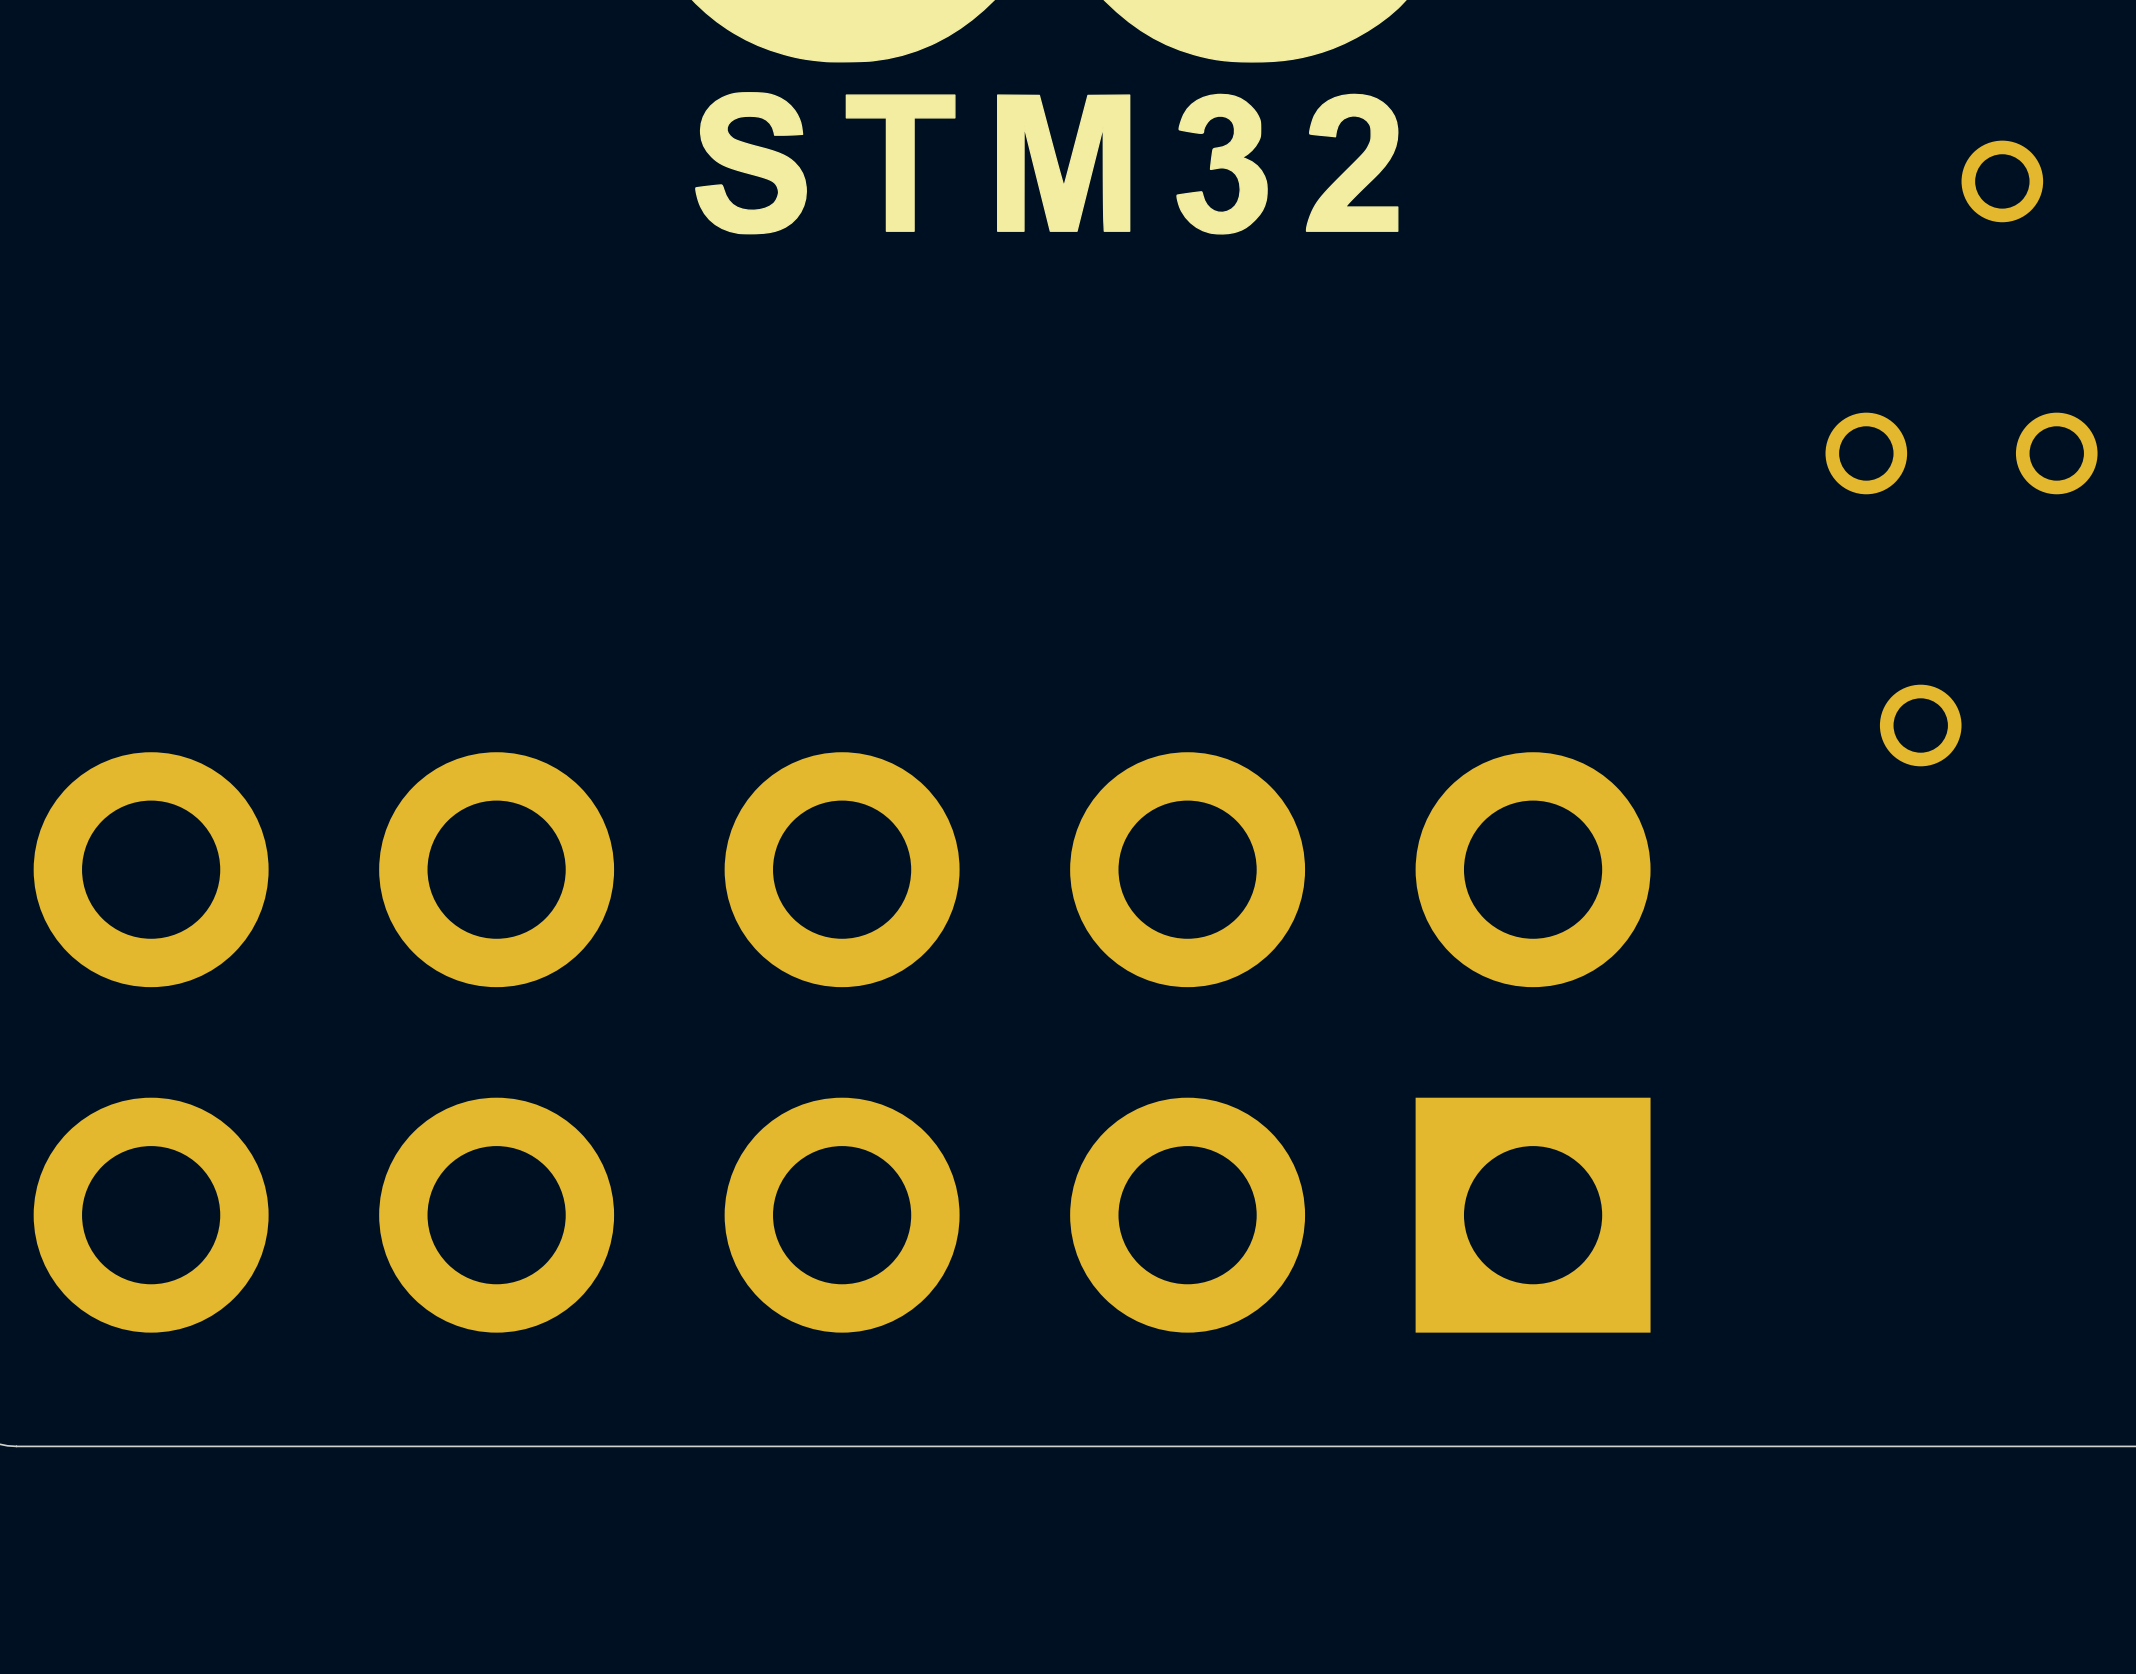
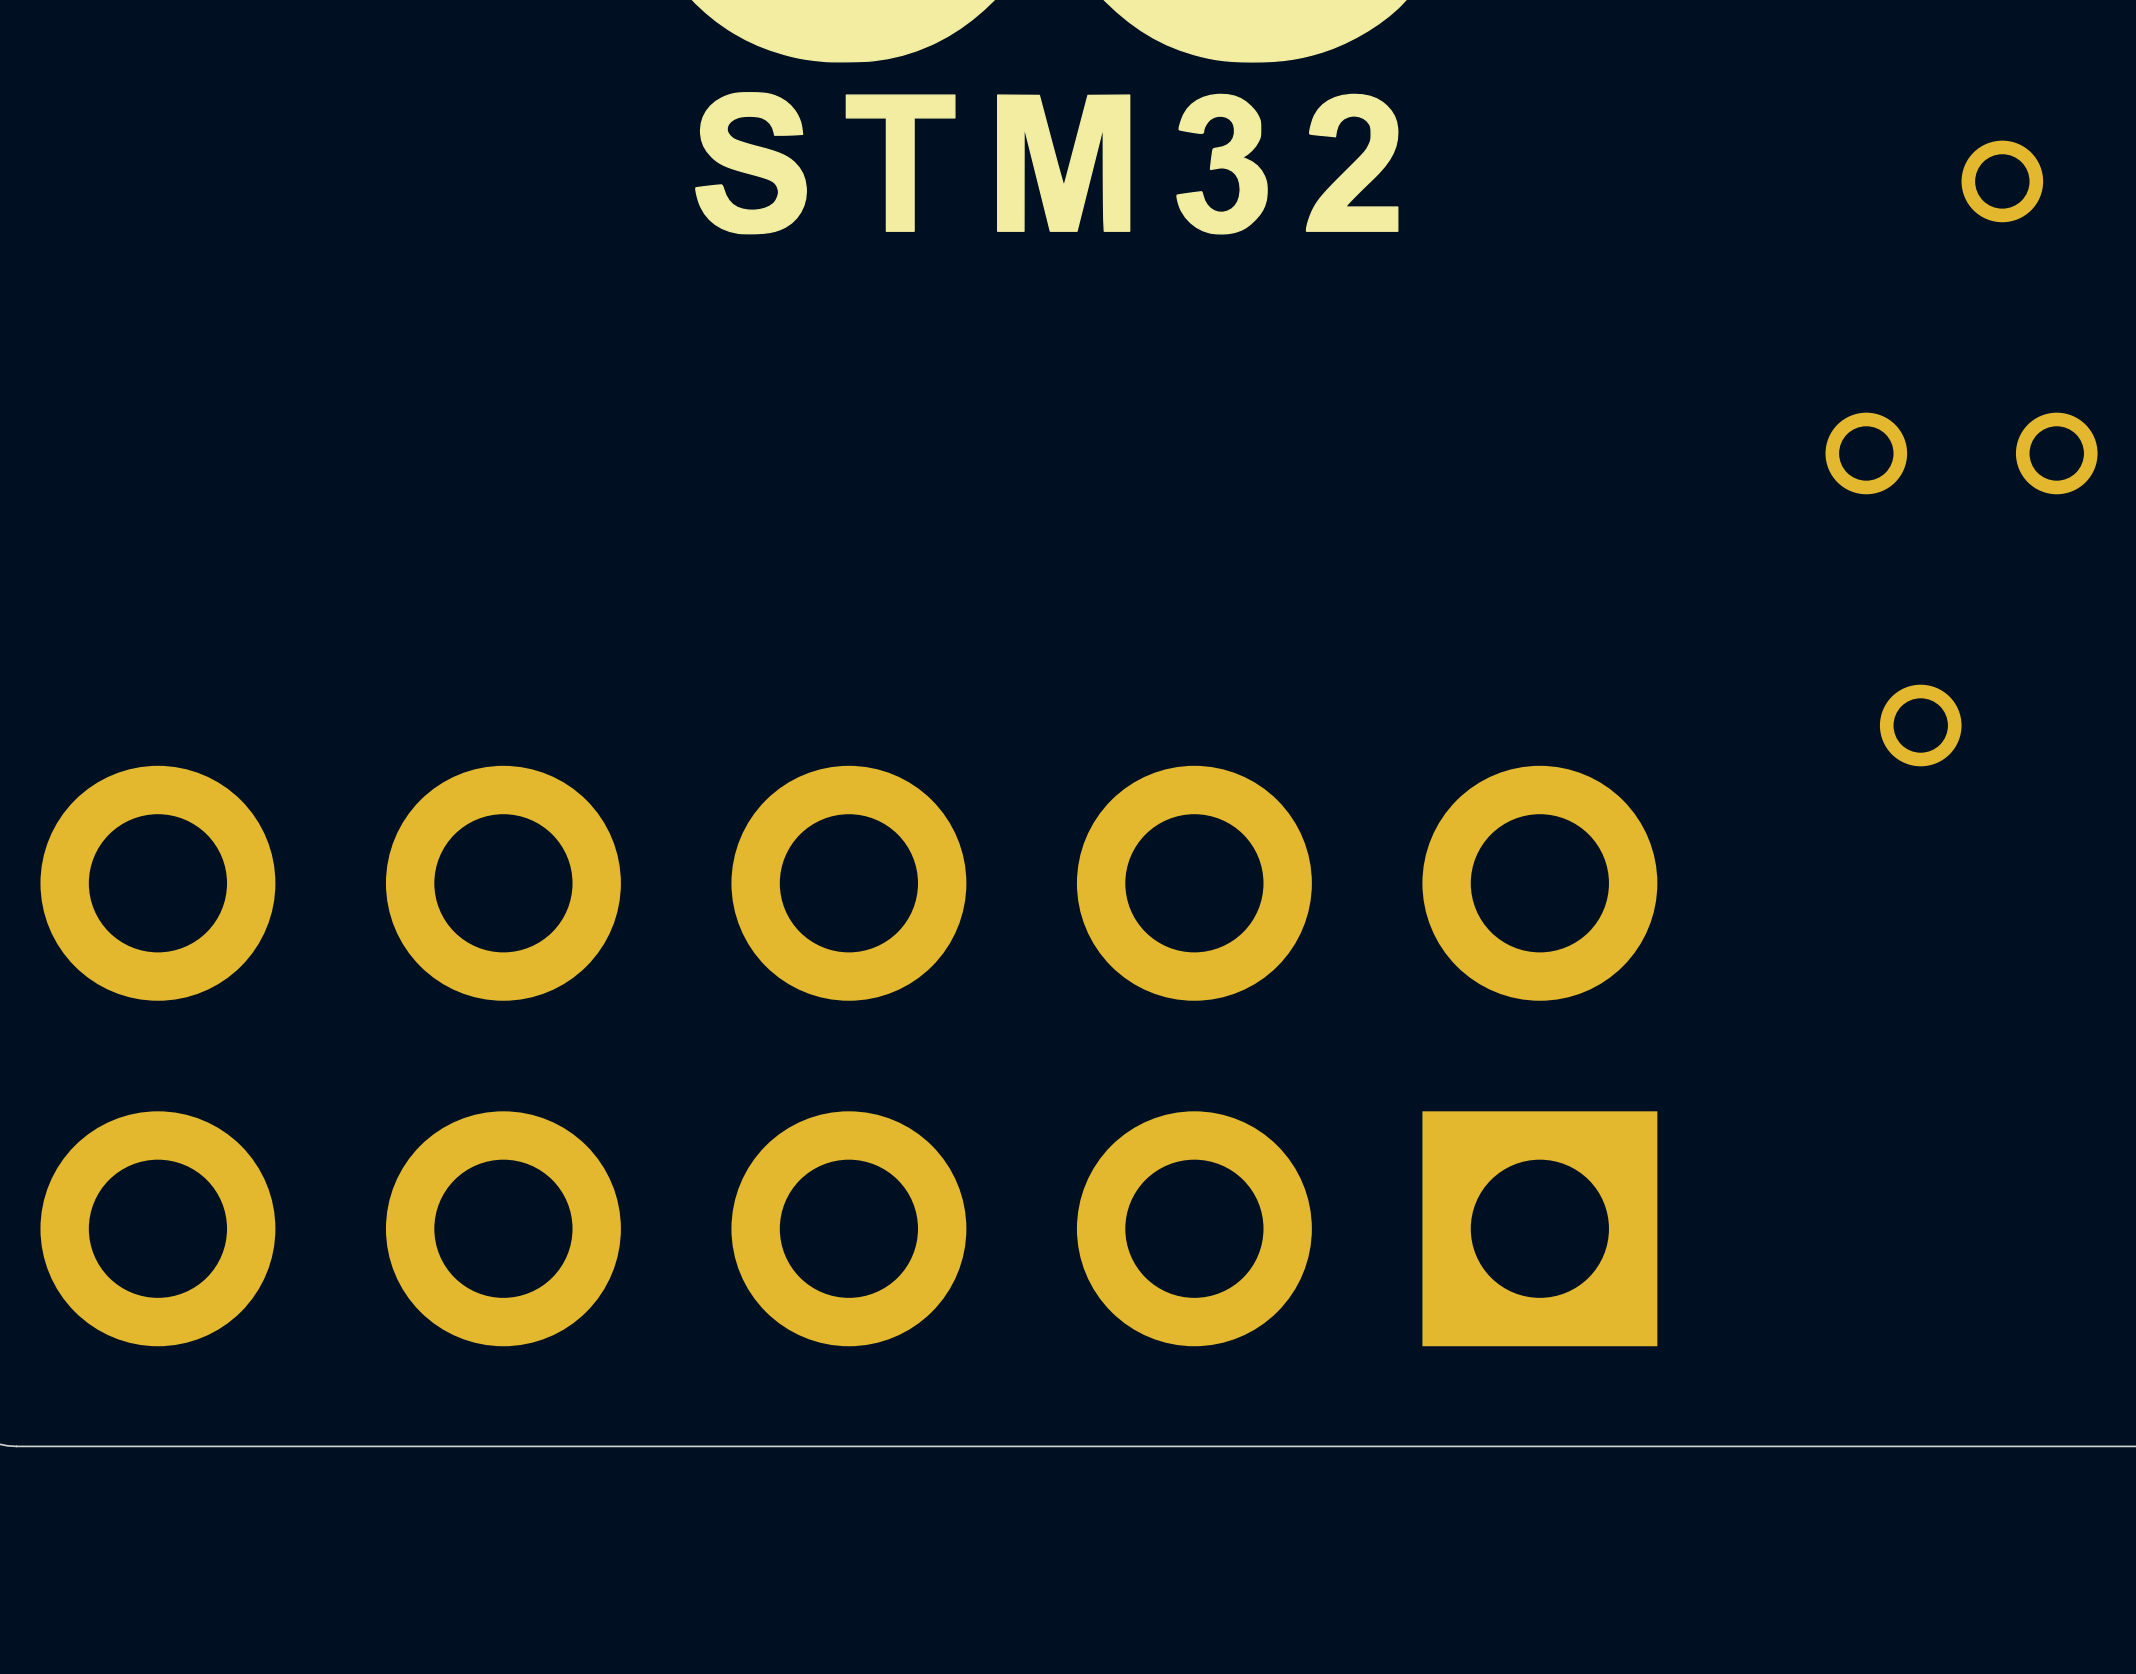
part position: (842, 1042) -> (848, 1056)

